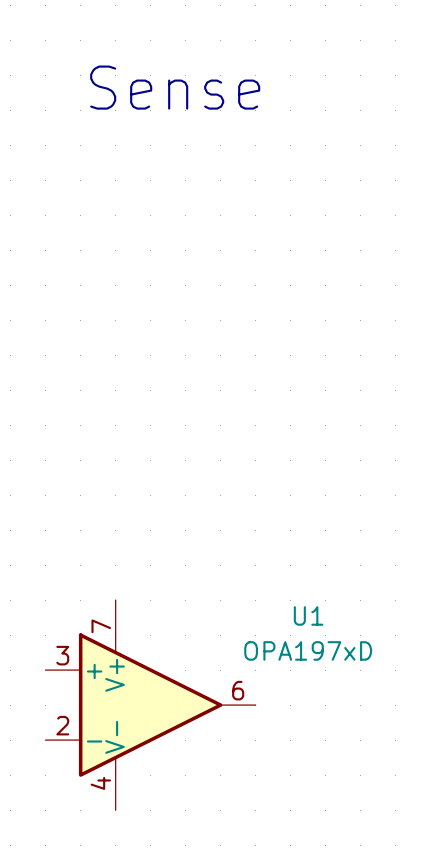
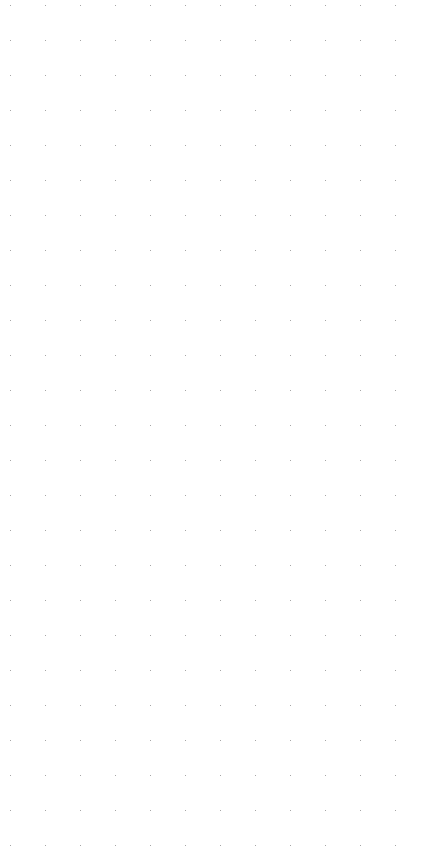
text: Sense (175, 87) -> none
U1: OPA197xD (150, 705) -> none

